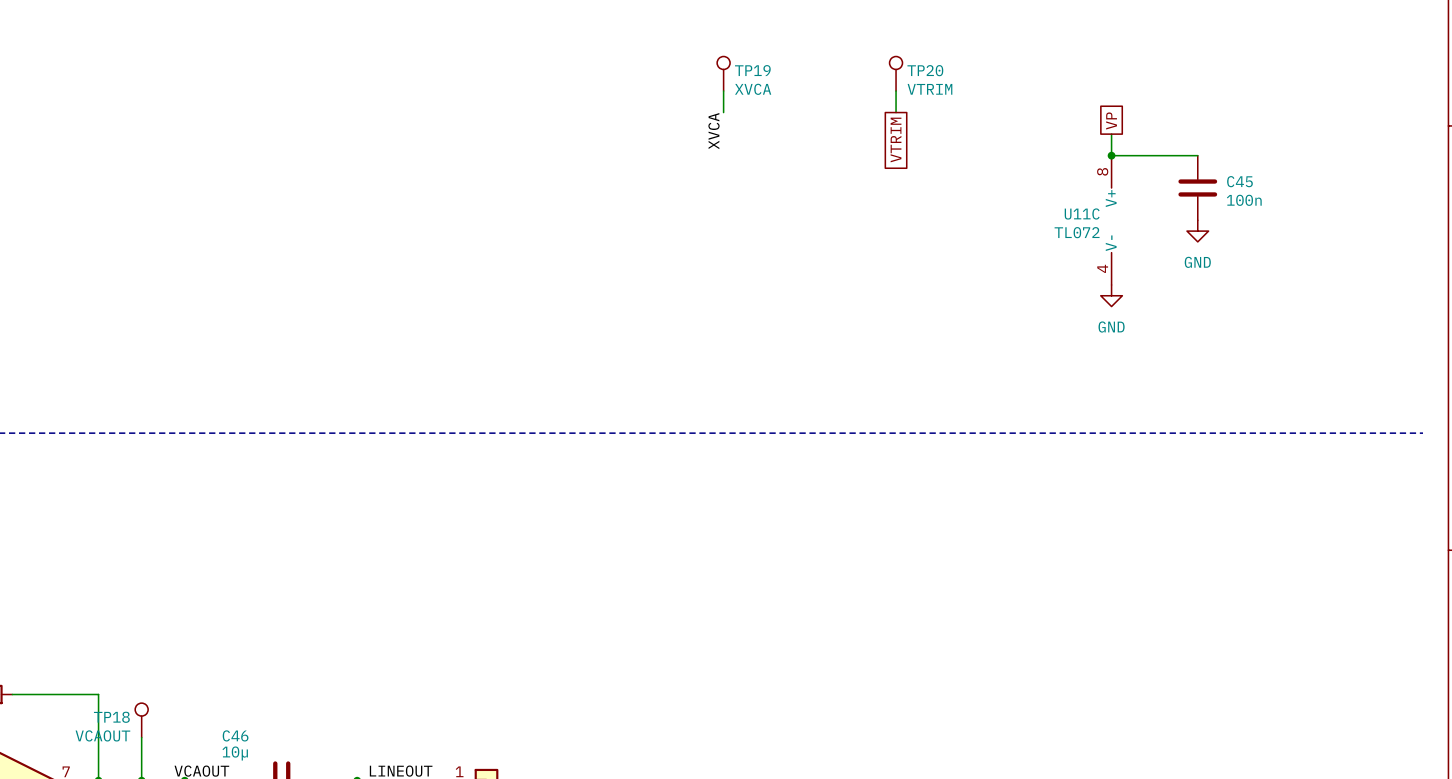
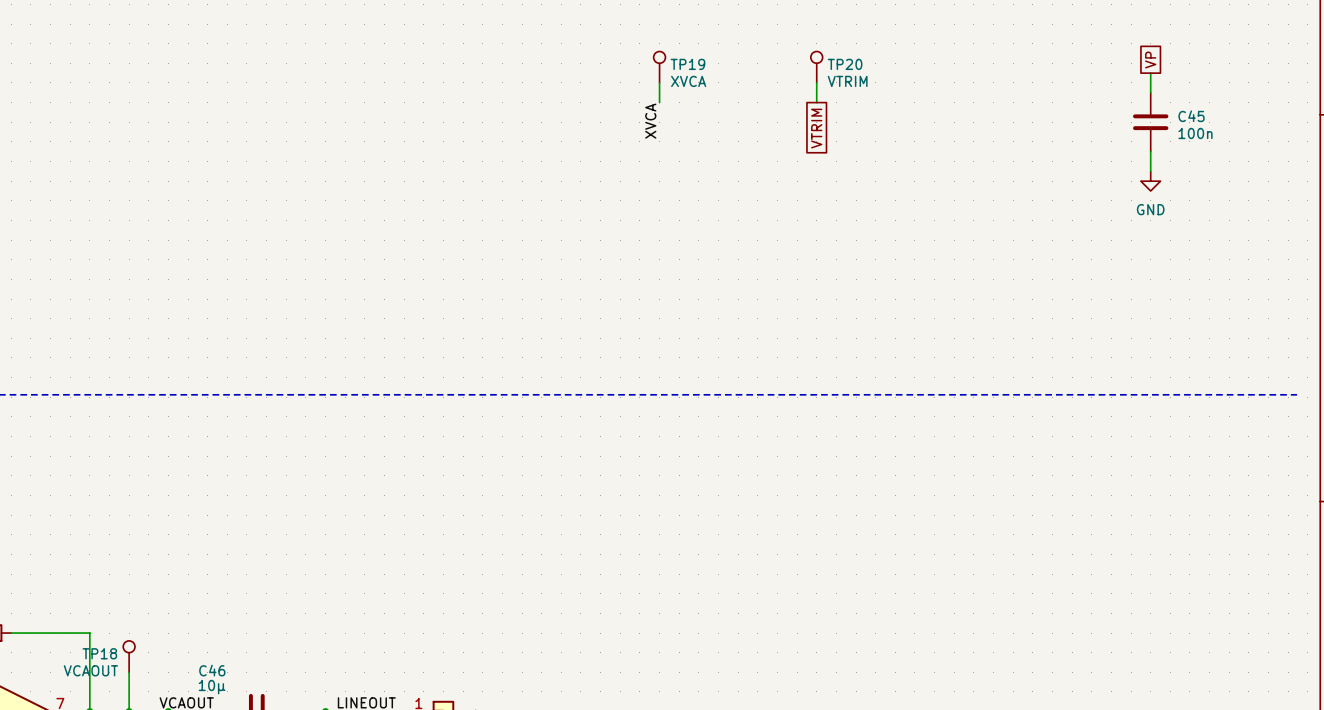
wire: none -> (1150, 73) (1150, 92)
global label position: VP (1111, 120) -> VP (1150, 60)
wire: (1111, 134) (1111, 155) (1197, 155) -> none
junction: (1111, 155) -> none
wire: none -> (1150, 151) (1150, 171)
C45 position: (1197, 188) -> (1150, 122)
U11C: TL072 (1111, 220) -> none
power symbol position: GND (1197, 231) -> GND (1150, 181)
power symbol: GND (1111, 295) -> none

